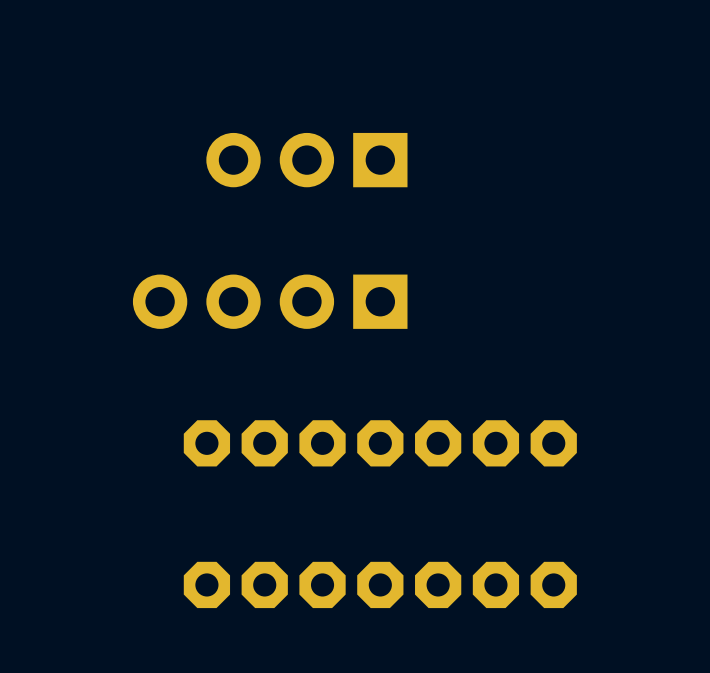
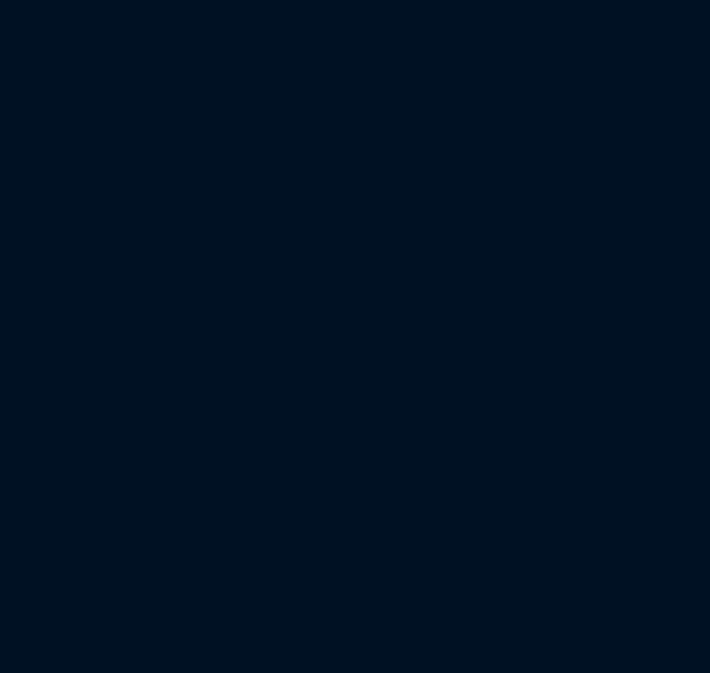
part: (306, 160) -> none
part: (270, 301) -> none
part: (380, 443) -> none
part: (380, 584) -> none

